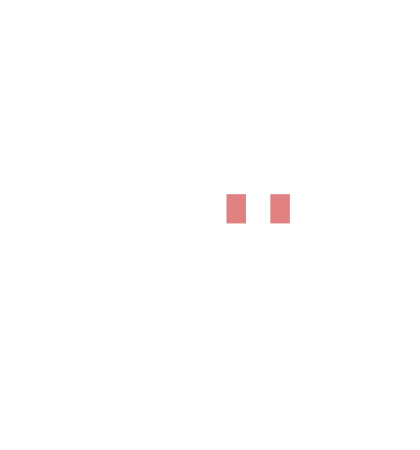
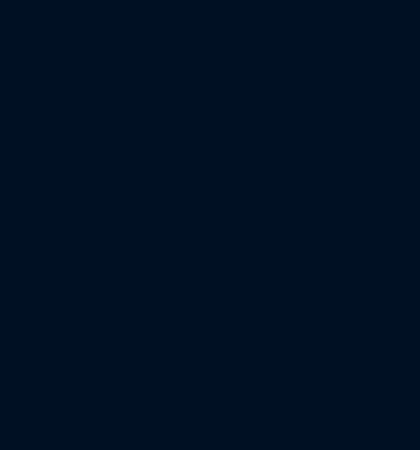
part: (258, 208) -> none

